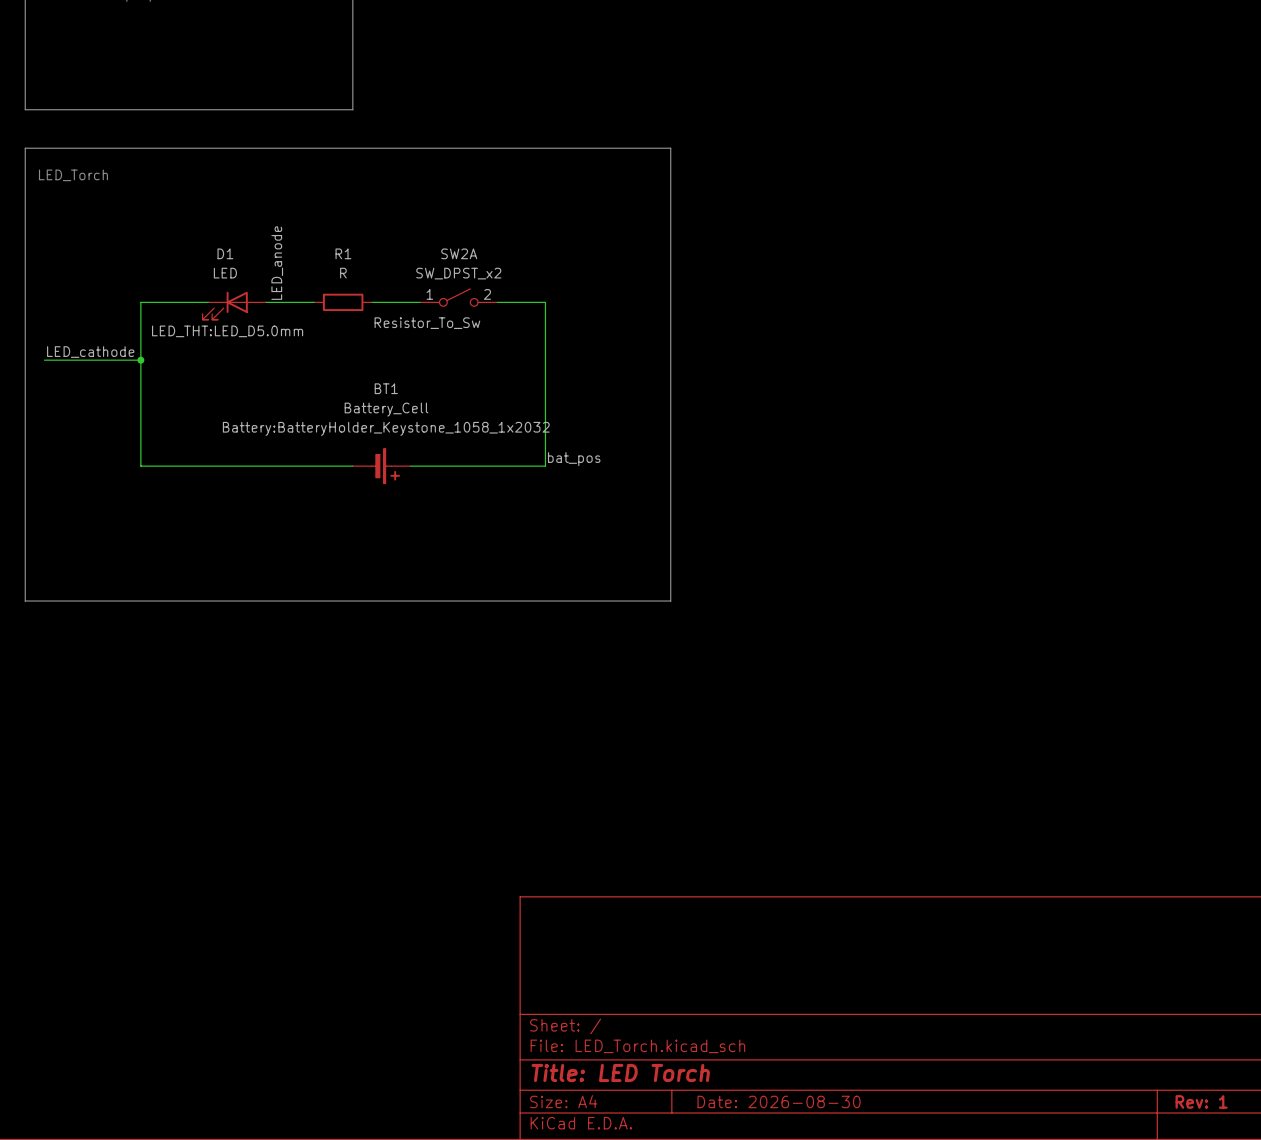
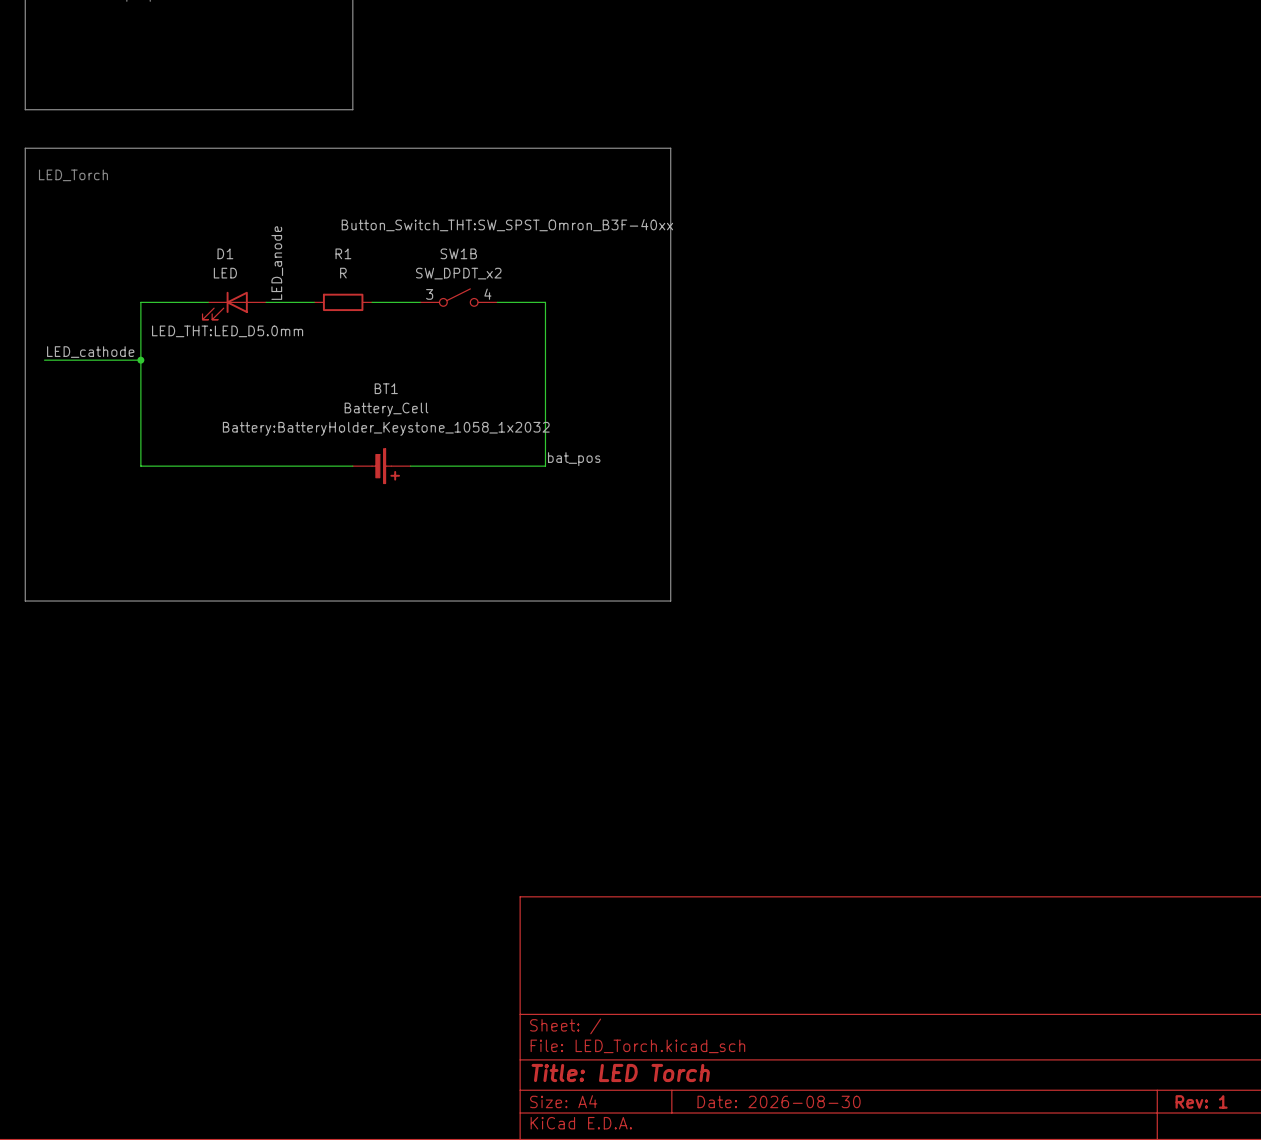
SW2A text: none -> Button_Switch_THT:SW_SPST_Omron_B3F-40xx (507, 225)
SW2A name: SW2A (459, 253) -> SW1B (458, 253)
SW2A value: SW_DPST_x2 (458, 273) -> SW_DPDT_x2 (458, 273)
SW2A pin number: 1 (429, 294) -> 3 (429, 294)
SW2A pin number: 2 (487, 294) -> 4 (487, 294)
label: Resistor_To_Sw (427, 323) -> none

